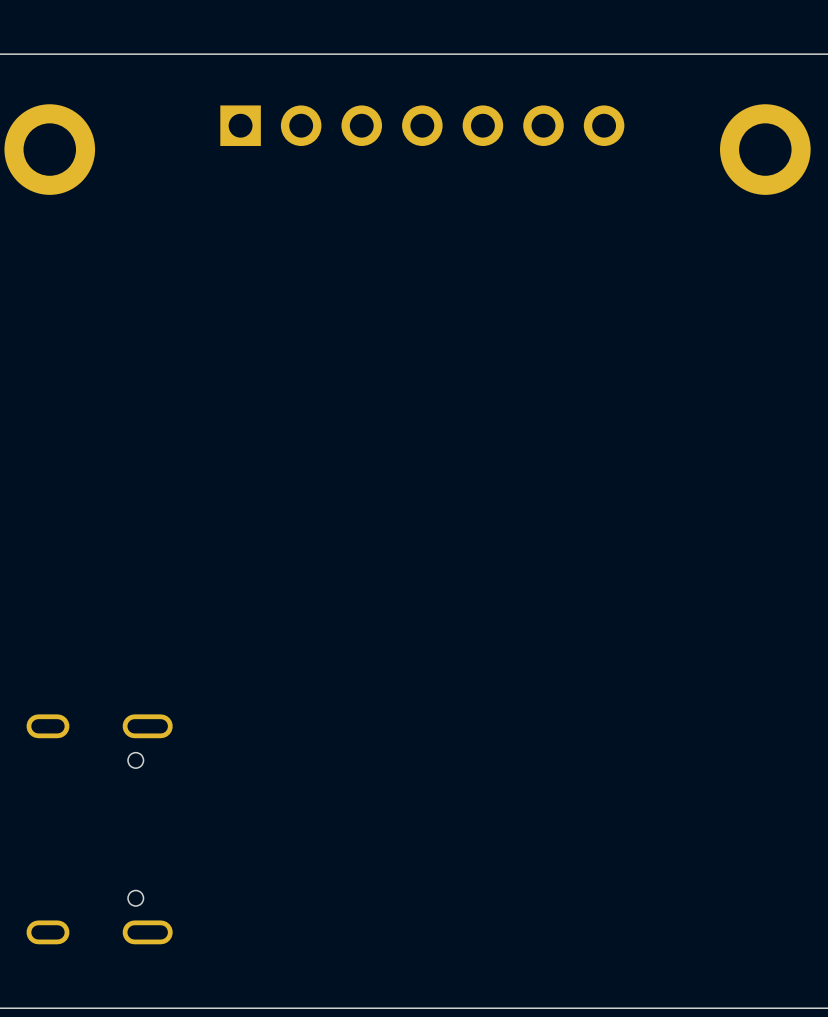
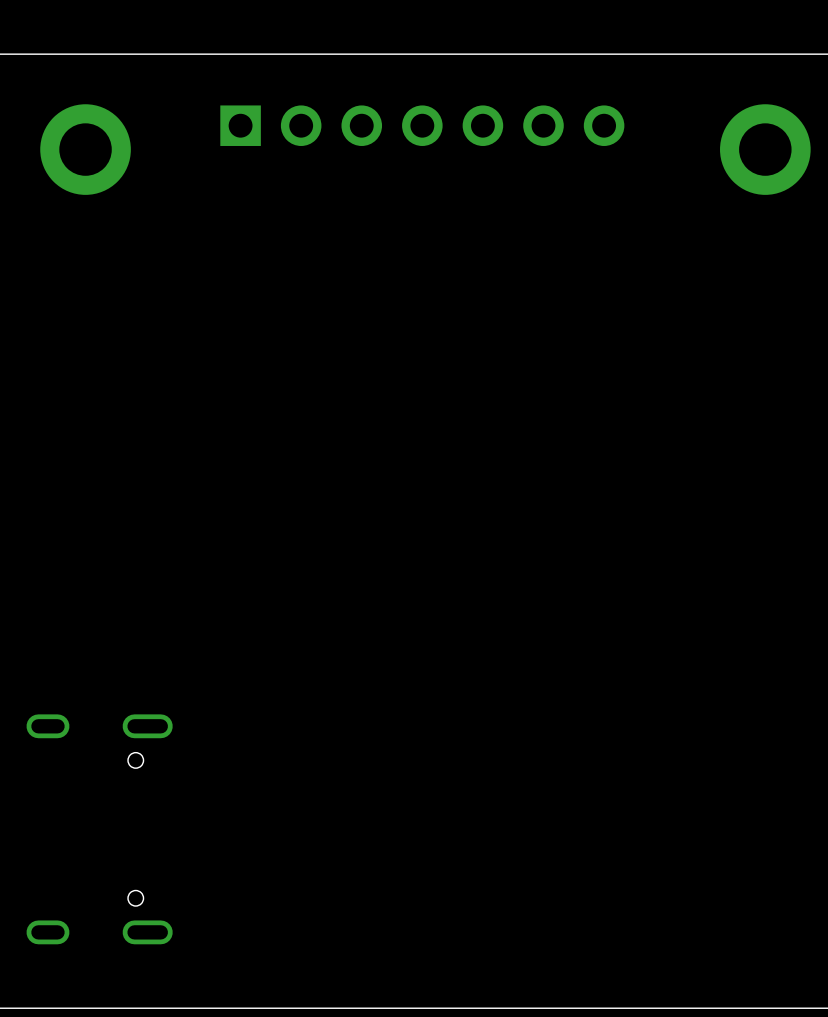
part position: (49, 149) -> (85, 149)

